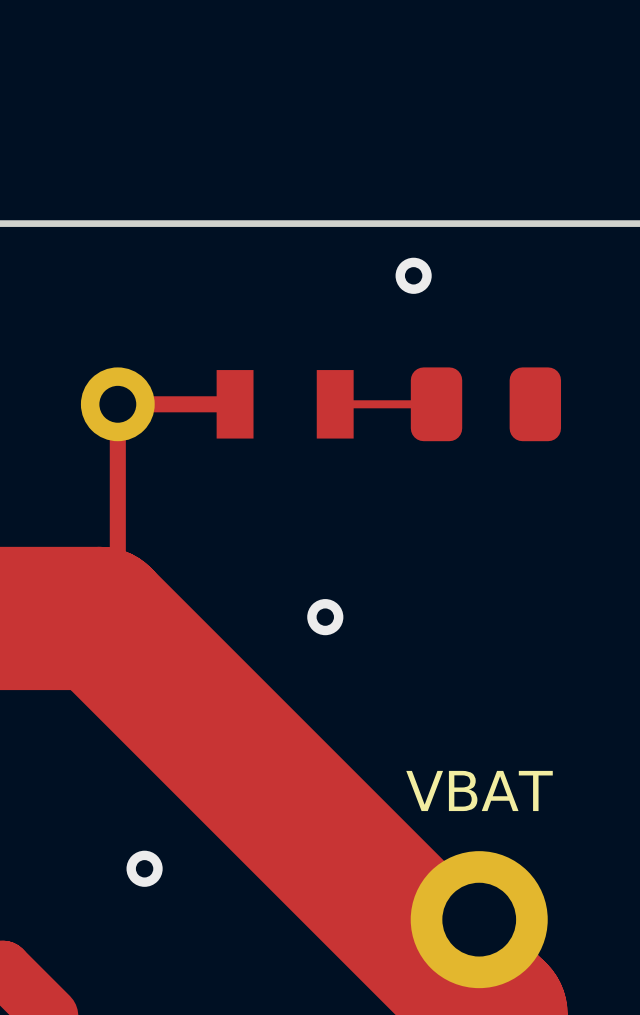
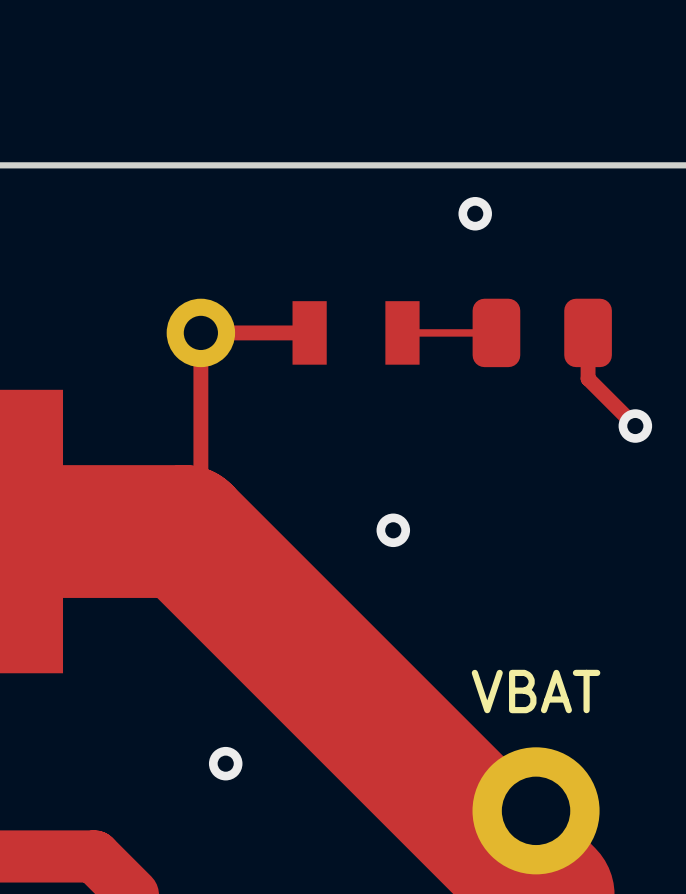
top track: none -> (588, 332) (588, 378) (635, 426)
via: none -> (635, 426)

